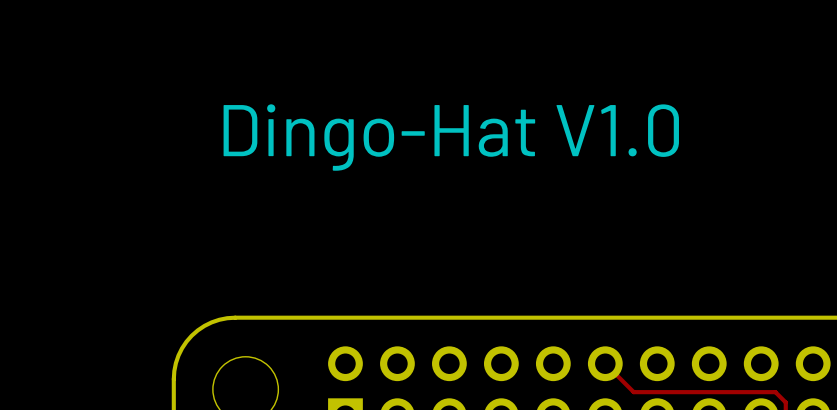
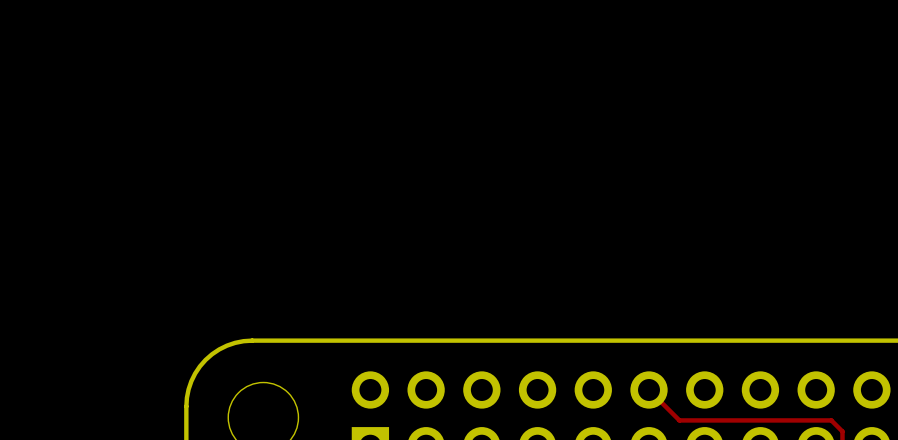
text: Dingo-Hat V1.0 (451, 137) -> none

